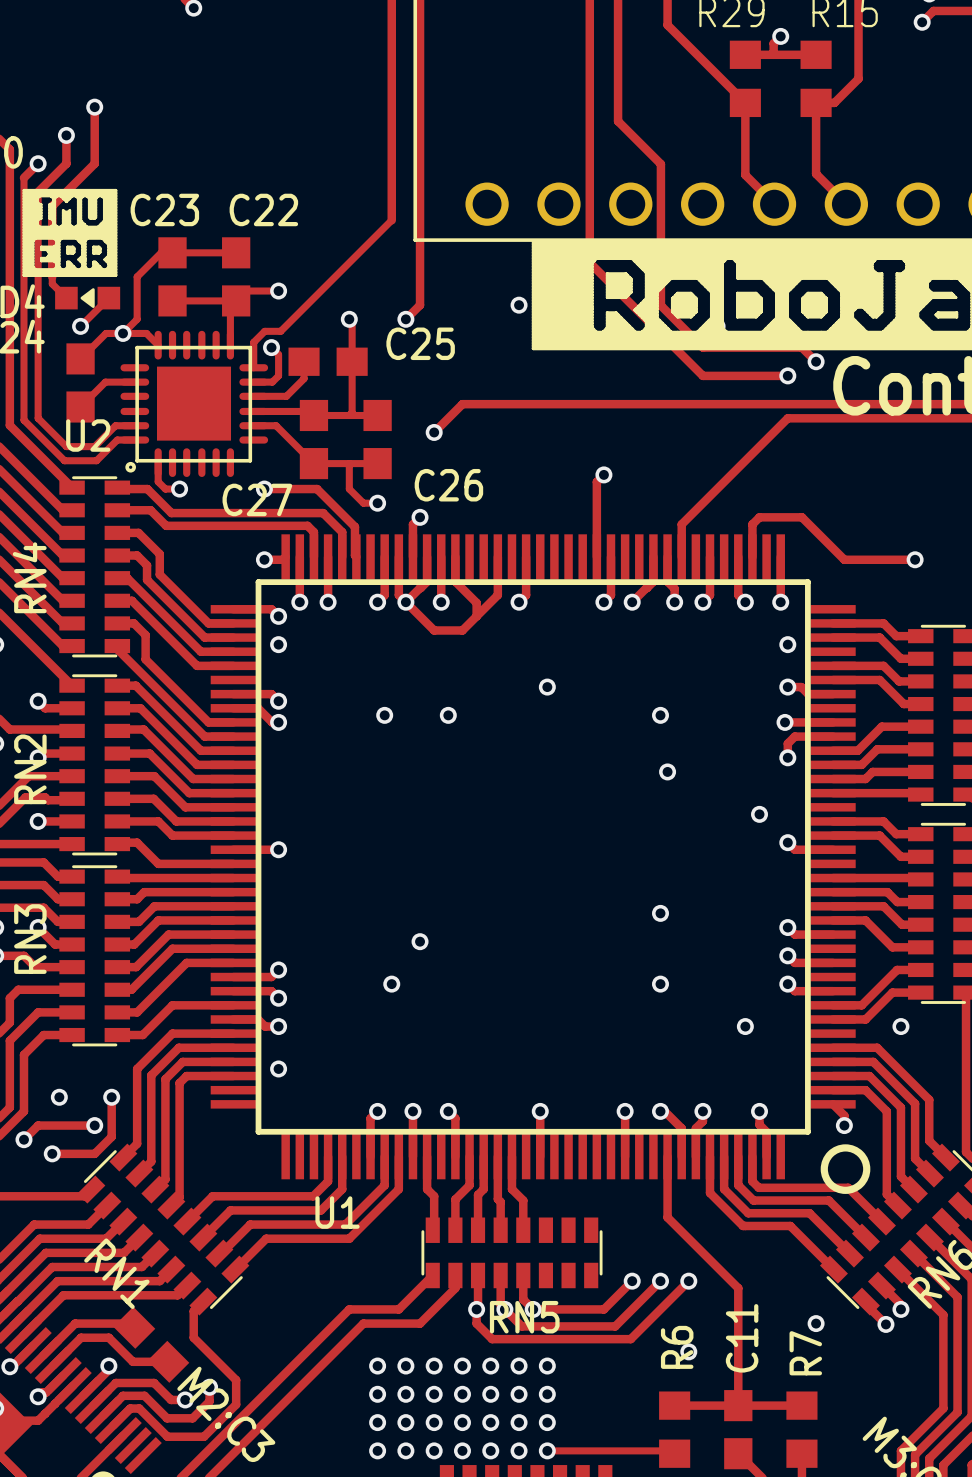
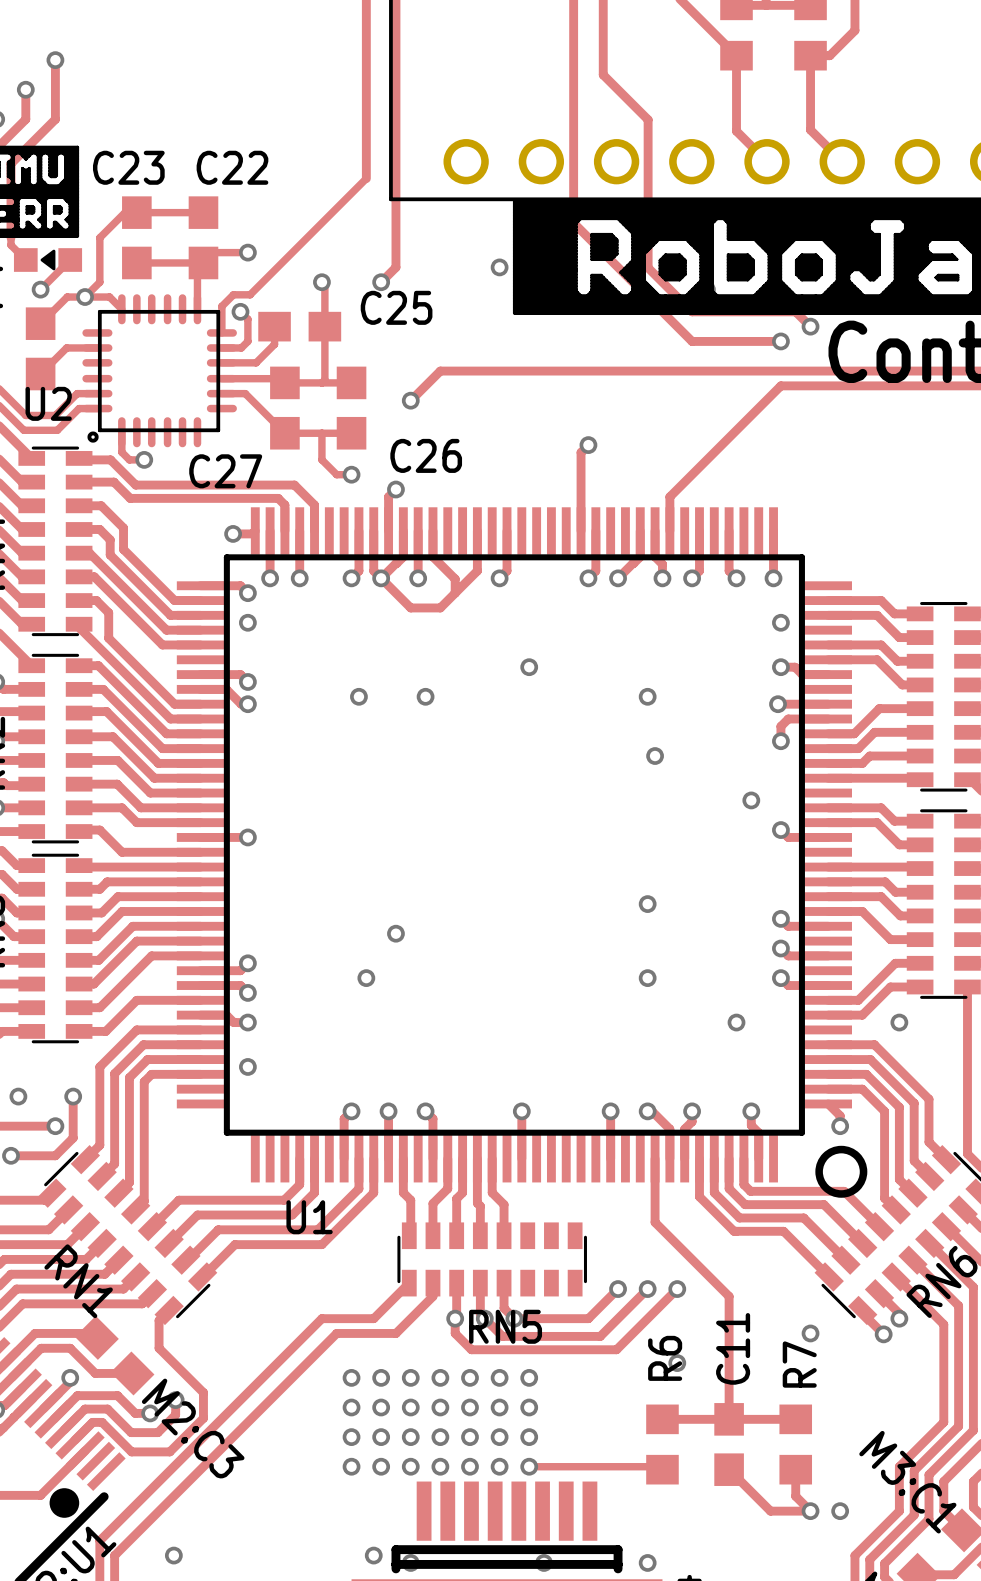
U2 footprint: [120, 330, 269, 478] -> [82, 294, 237, 448]
track: (264, 489) (317, 489) (354, 526) (356, 556) -> none
via: (264, 489) -> none
track: (752, 556) (752, 524) (759, 517) (801, 517) (844, 559) (915, 559) -> none
via: (915, 559) -> none

